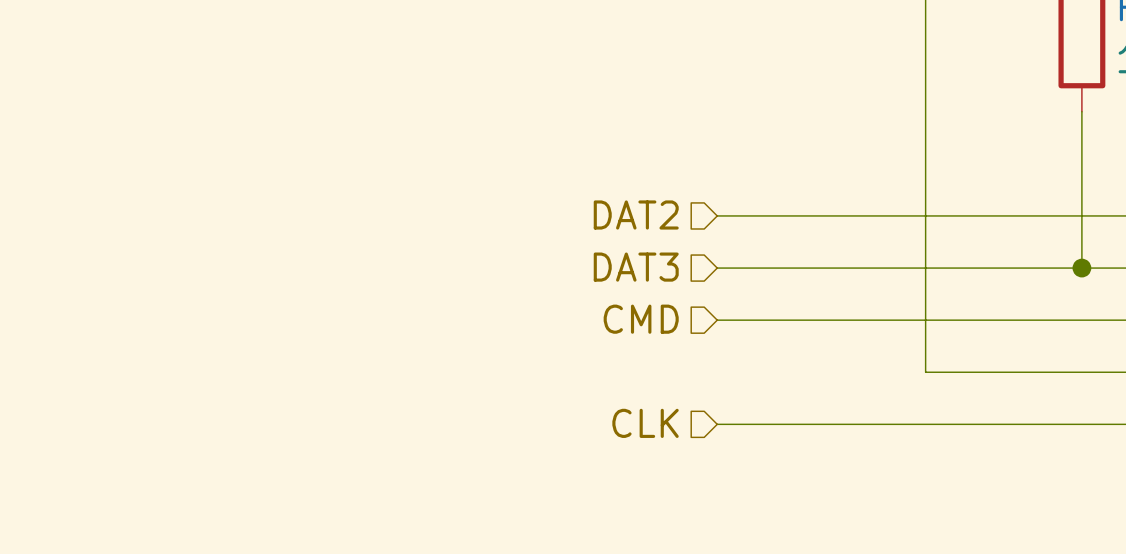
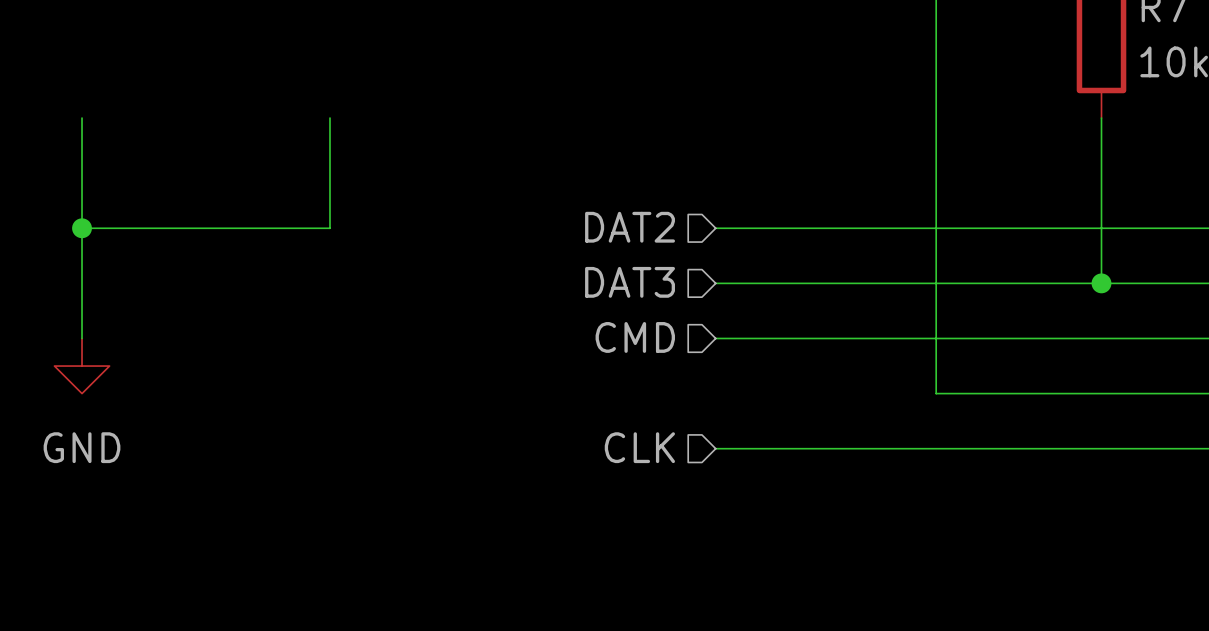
wire: none -> (82, 118) (82, 338)
wire: none -> (329, 118) (329, 228) (82, 228)
junction: none -> (82, 228)
power symbol: none -> GND (82, 366)

